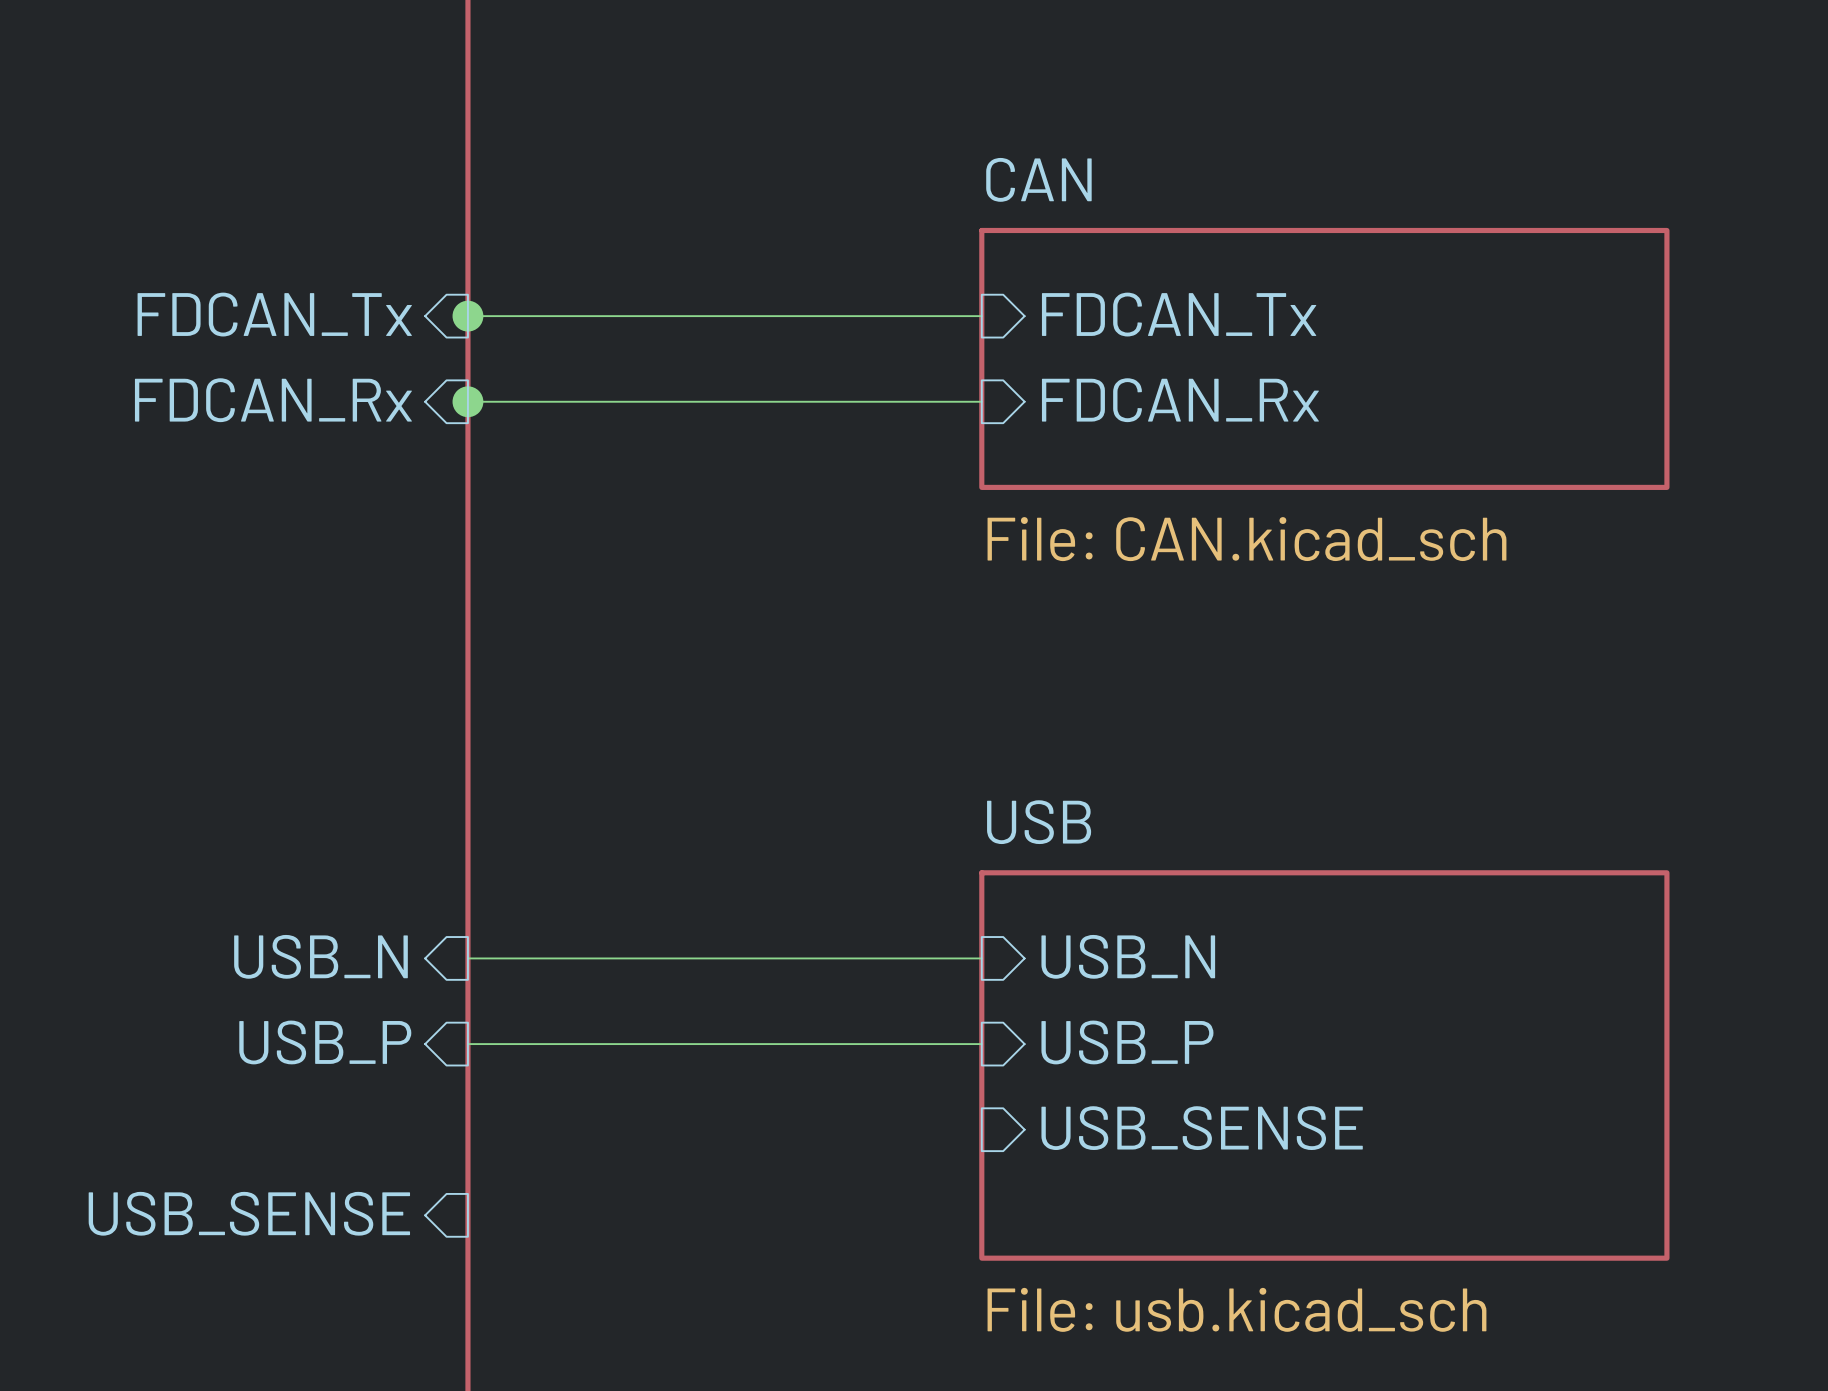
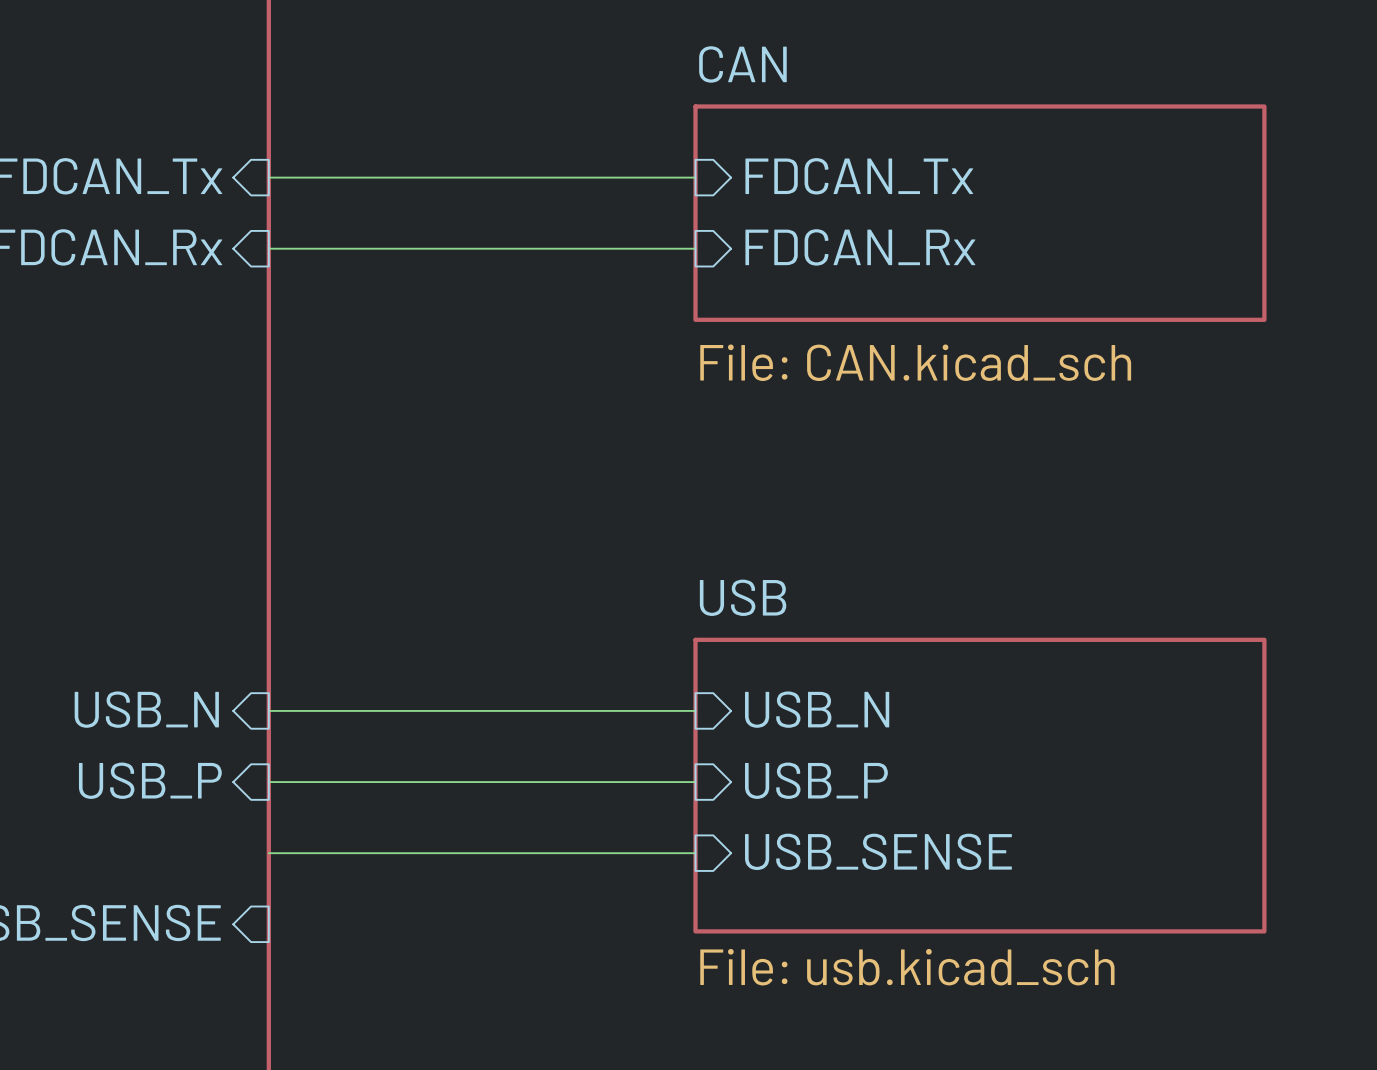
junction: (467, 316) -> none
junction: (467, 401) -> none
sheet USB shape: [979, 870, 1670, 1261] -> [693, 637, 1267, 934]
wire: none -> (268, 853) (695, 853)

